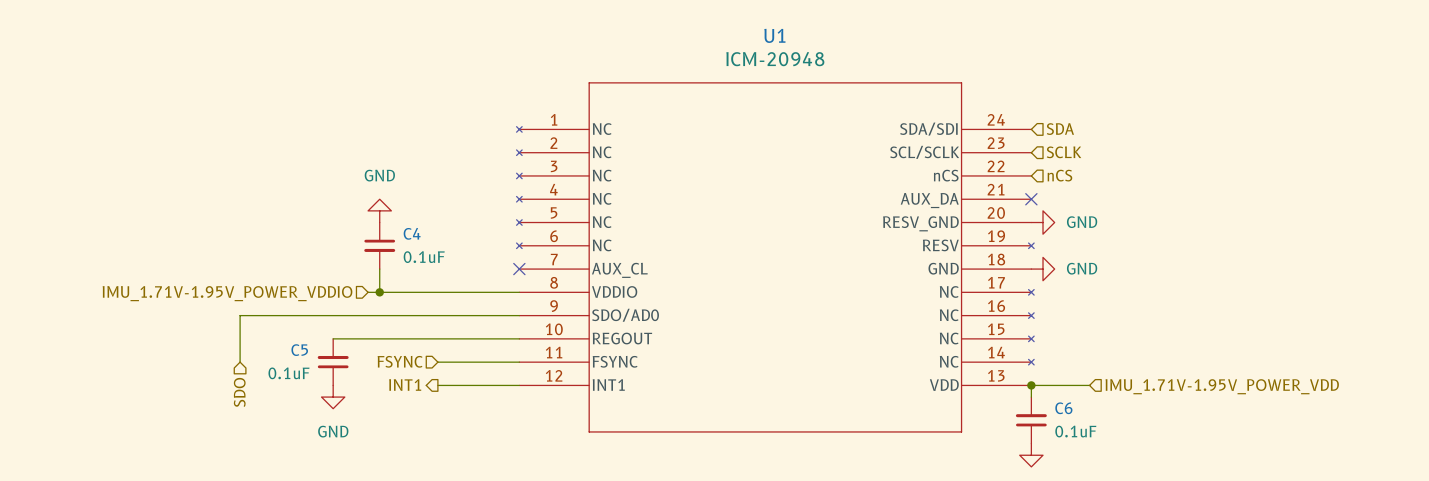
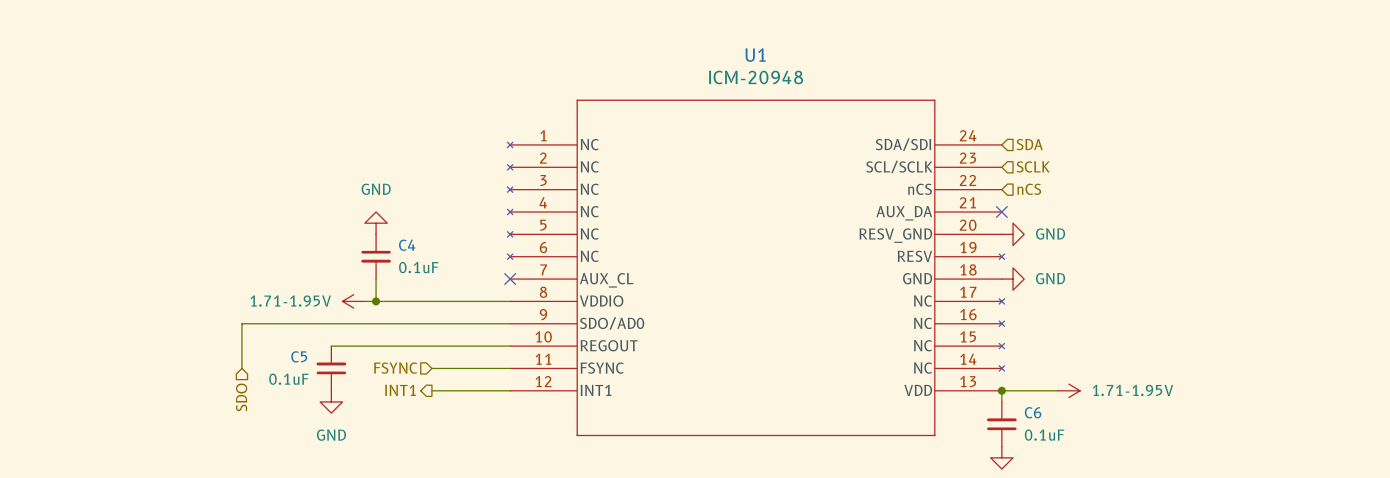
power symbol: none -> 1.71-1.95V (353, 301)
hierarchical label: IMU_1.71V-1.95V_POWER_VDDIO (227, 293) -> none
power symbol: none -> 1.71-1.95V (1068, 390)
hierarchical label: IMU_1.71V-1.95V_POWER_VDD (1222, 386) -> none

